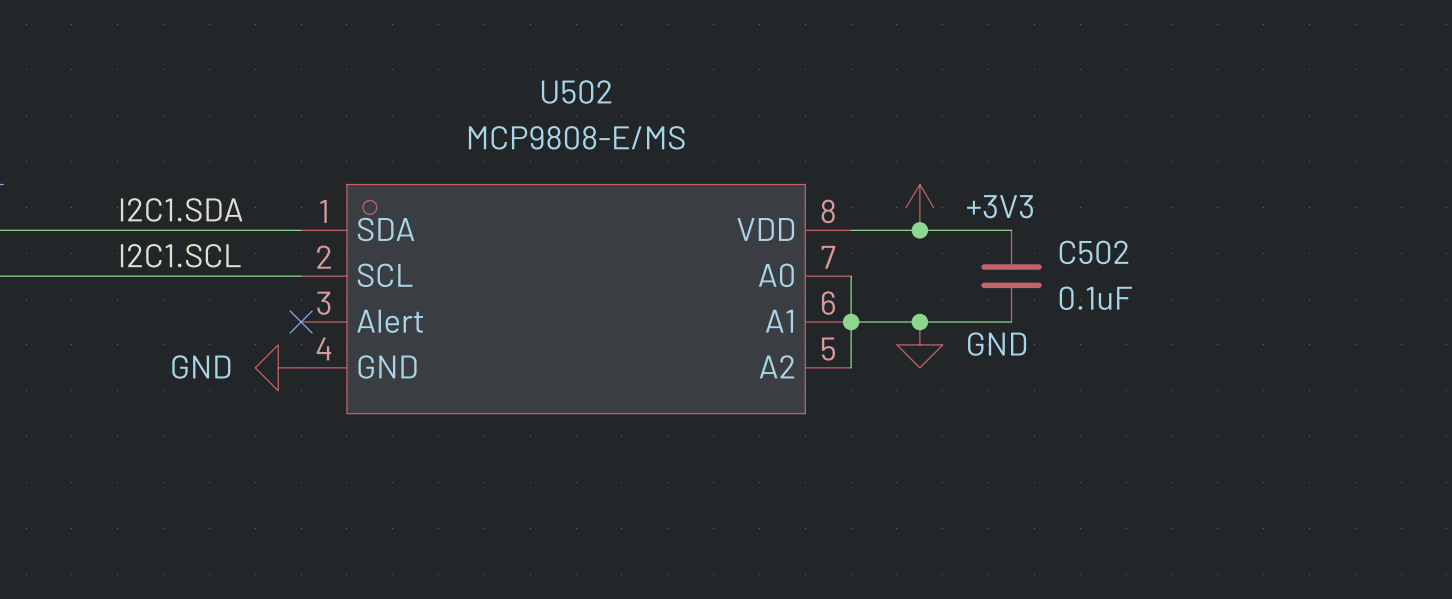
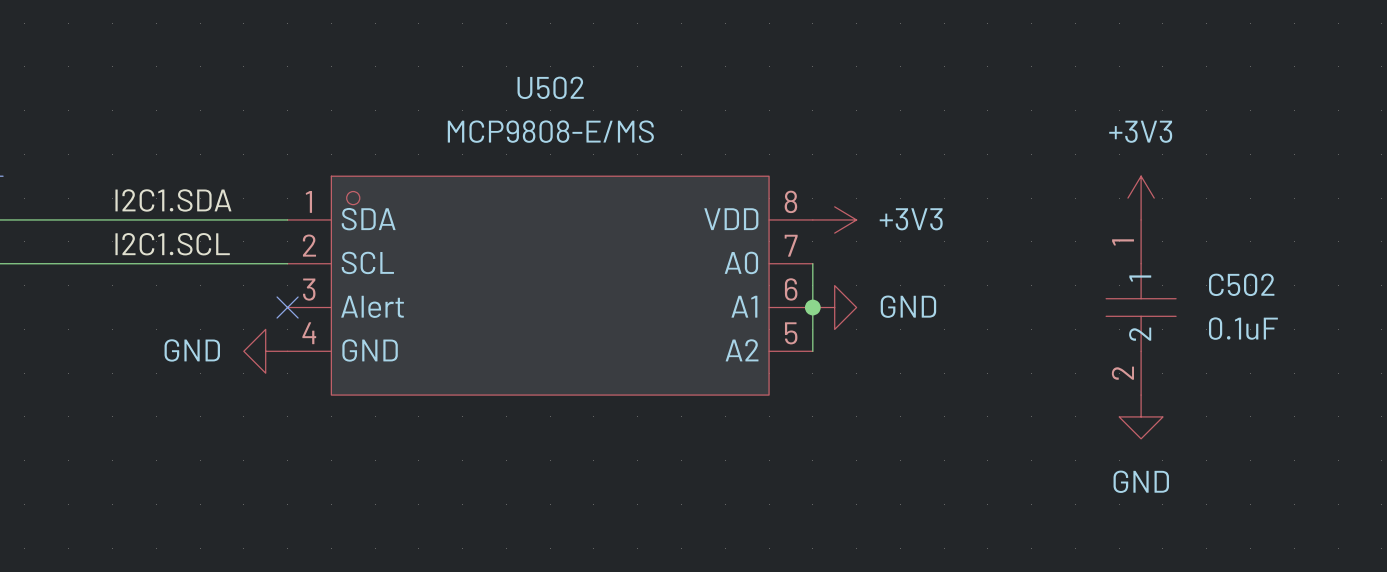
power symbol rotation: 0° (919, 207) -> 90° clockwise (834, 219)
power symbol position: +3V3 (919, 207) -> +3V3 (834, 219)
power symbol: none -> +3V3 (1141, 198)
wire: (851, 230) (1011, 230) -> none
junction: (919, 230) -> none
C502 symbol: [981, 230, 1042, 323] -> [1106, 219, 1177, 396]
wire: (851, 322) (1011, 322) -> none
junction: (919, 322) -> none
power symbol rotation: 0° (919, 344) -> 90° counterclockwise (834, 307)
power symbol position: GND (919, 344) -> GND (834, 307)
power symbol: none -> GND (1141, 416)

